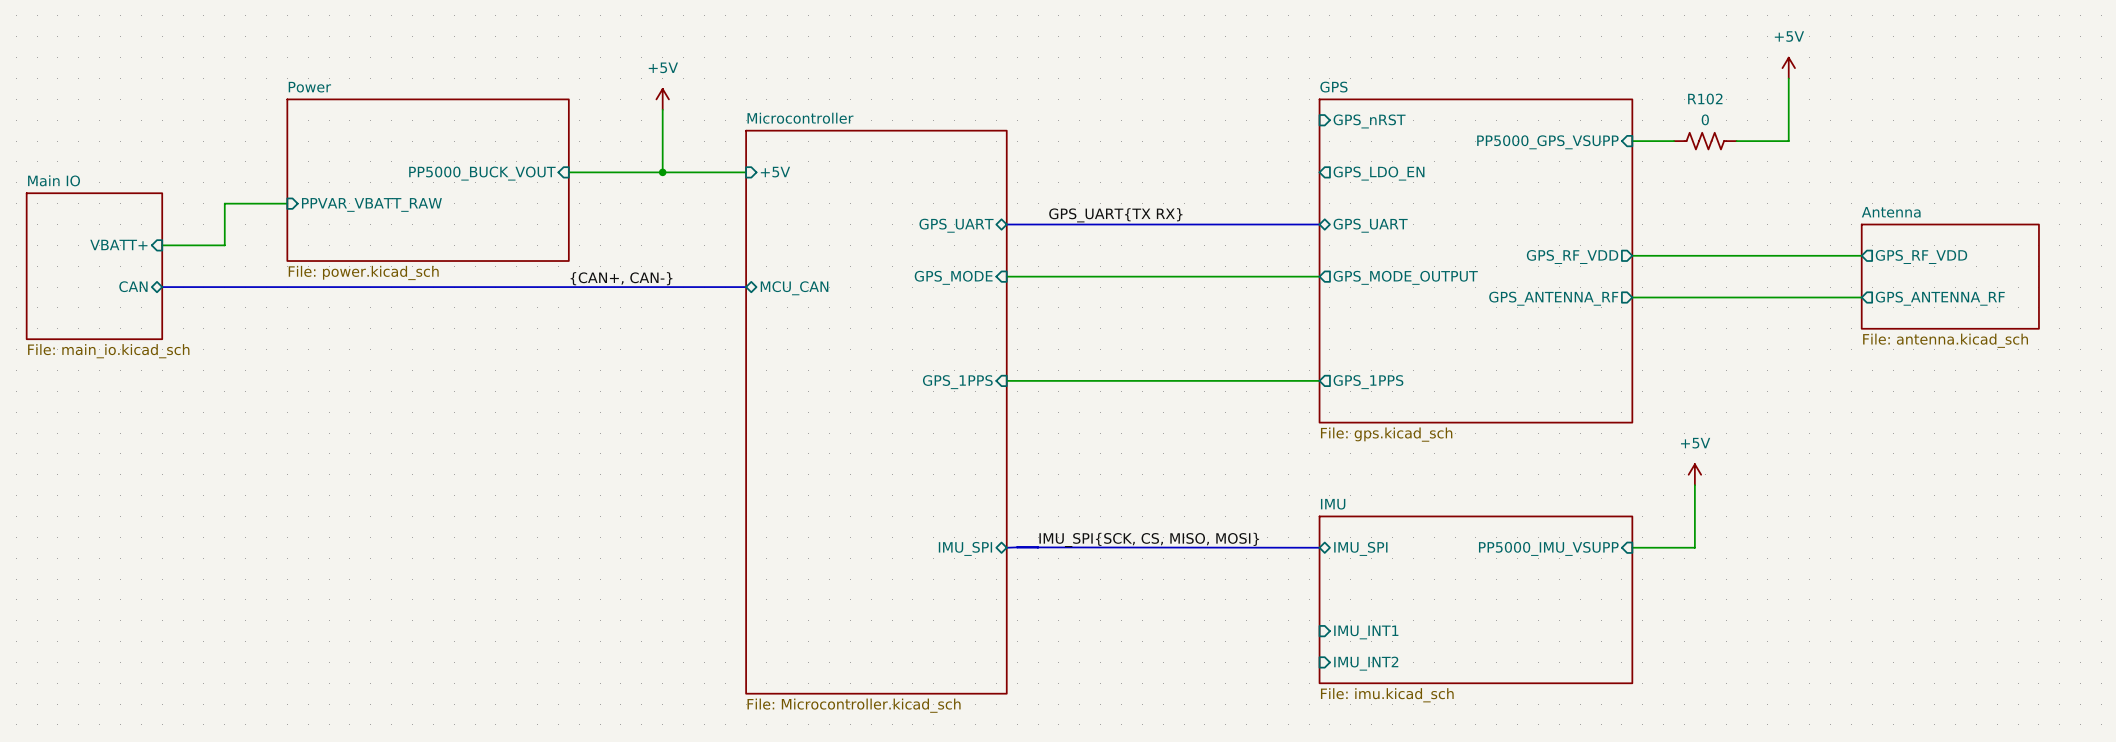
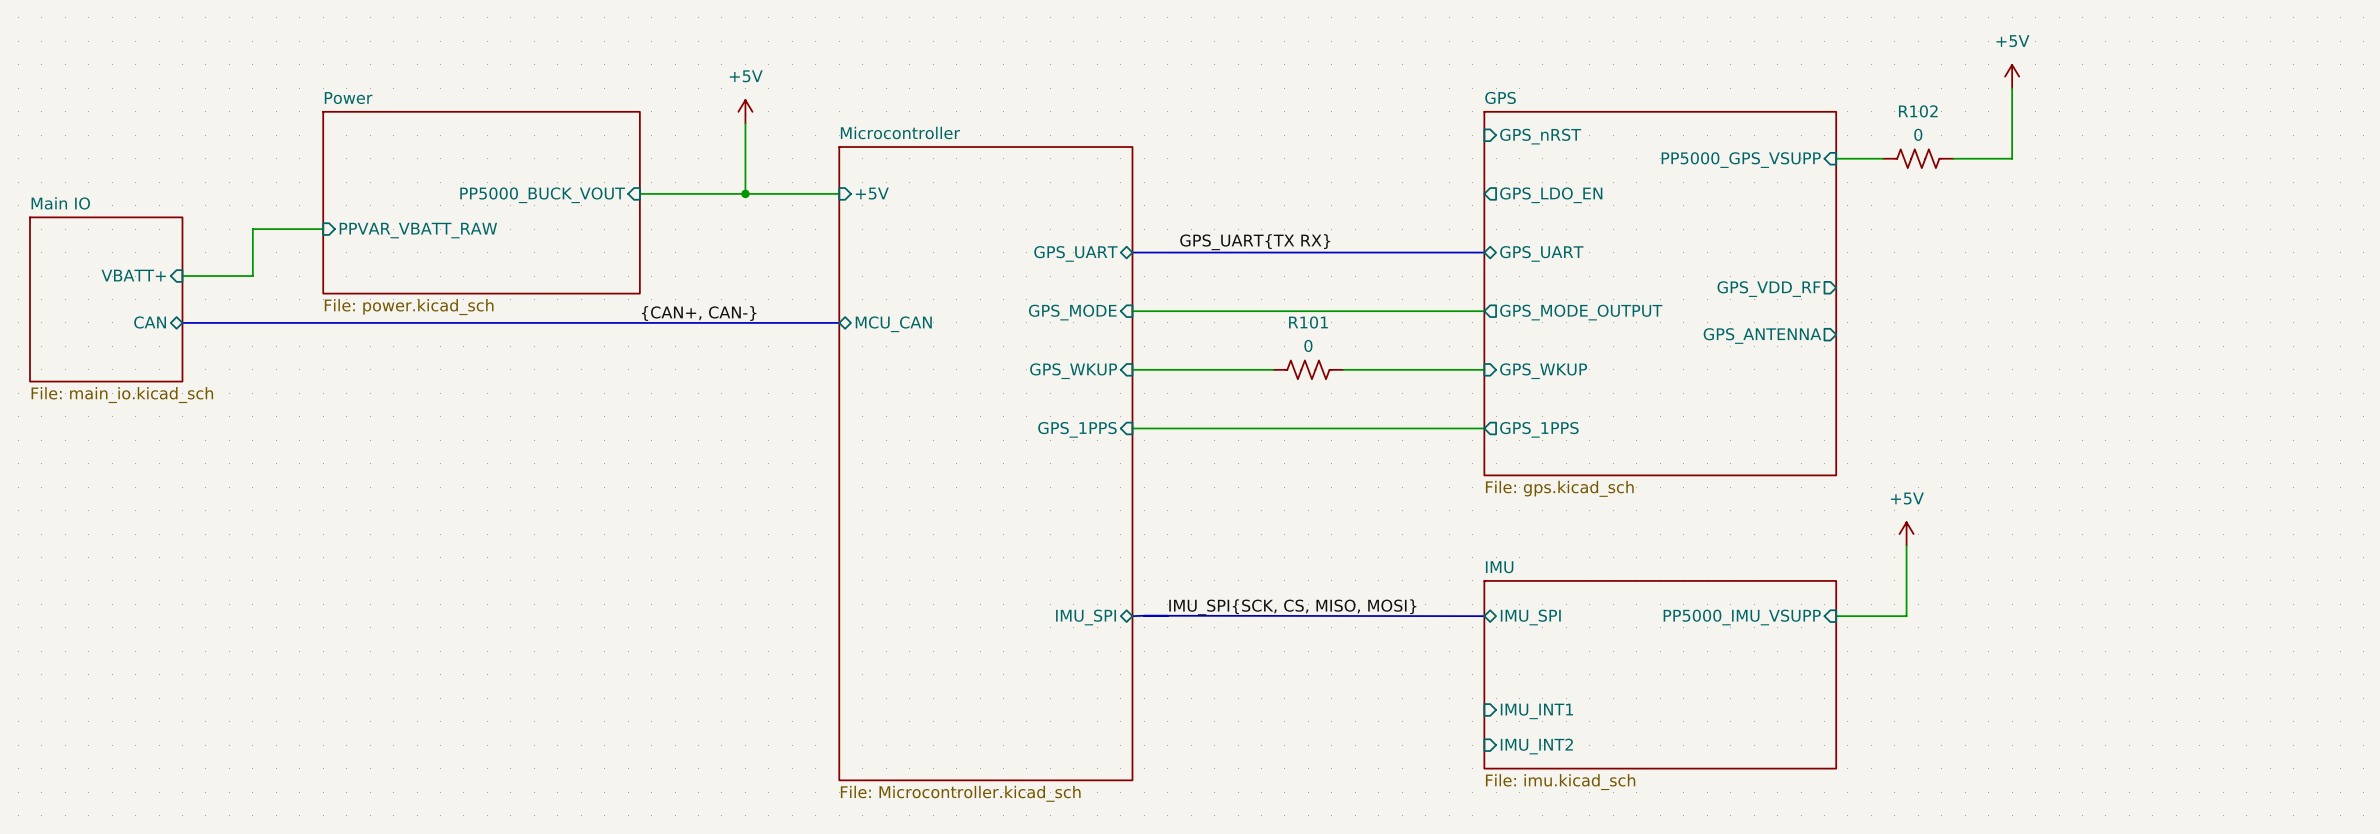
wire: (1632, 255) (1861, 255) -> none
sheet pin: GPS_RF_VDD (1572, 256) -> GPS_VDD_RF (1768, 289)
sheet pin: GPS_RF_VDD (1921, 256) -> none
sheet Antenna: File: antenna.kicad_sch (1950, 276) -> none
wire: (1632, 297) (1861, 297) -> none
sheet pin: GPS_ANTENNA_RF (1553, 298) -> GPS_ANTENNA (1762, 336)
sheet pin: GPS_ANTENNA_RF (1940, 298) -> none
wire: none -> (1132, 369) (1273, 369)
R101: none -> 0 (1308, 369)
wire: none -> (1343, 369) (1484, 369)
sheet pin: none -> GPS_WKUP (1073, 371)
sheet pin: none -> GPS_WKUP (1543, 371)

